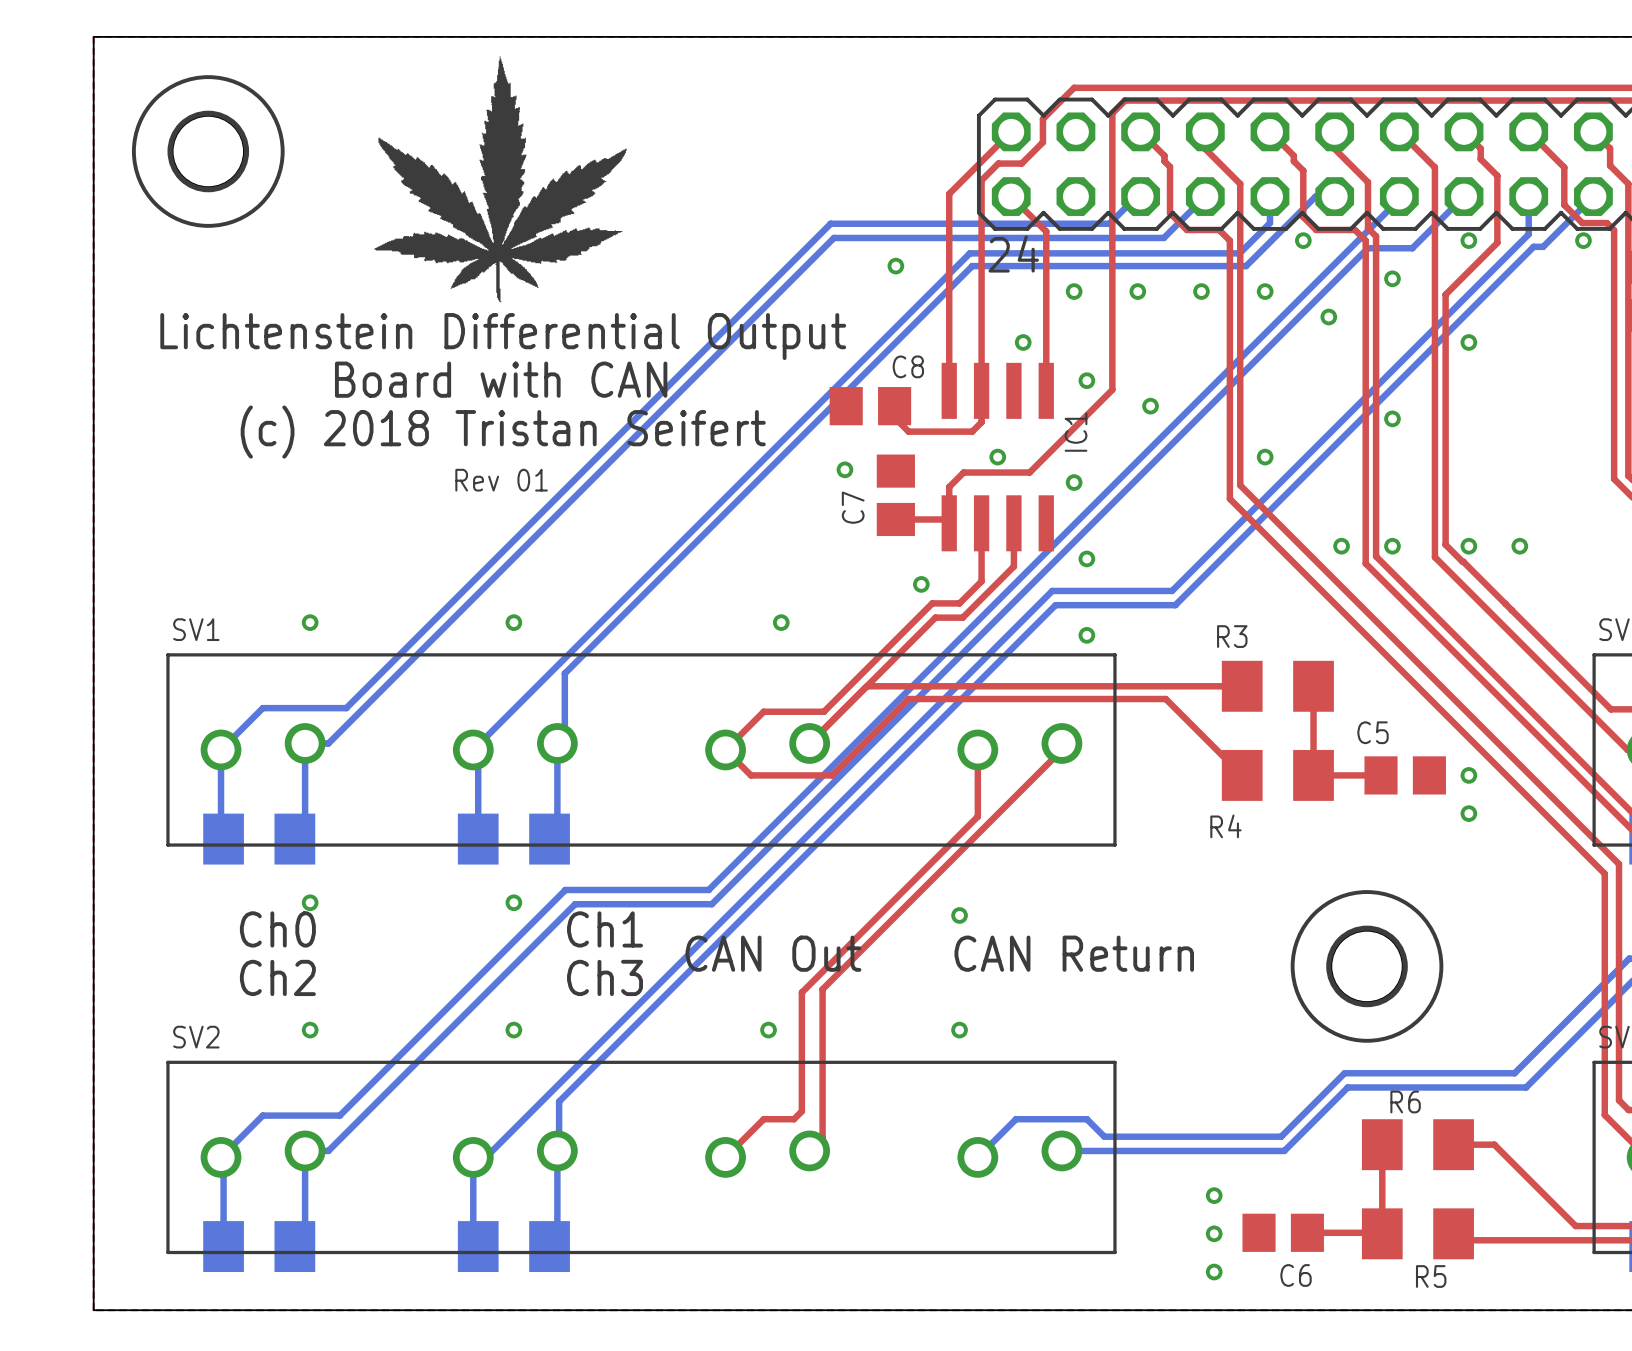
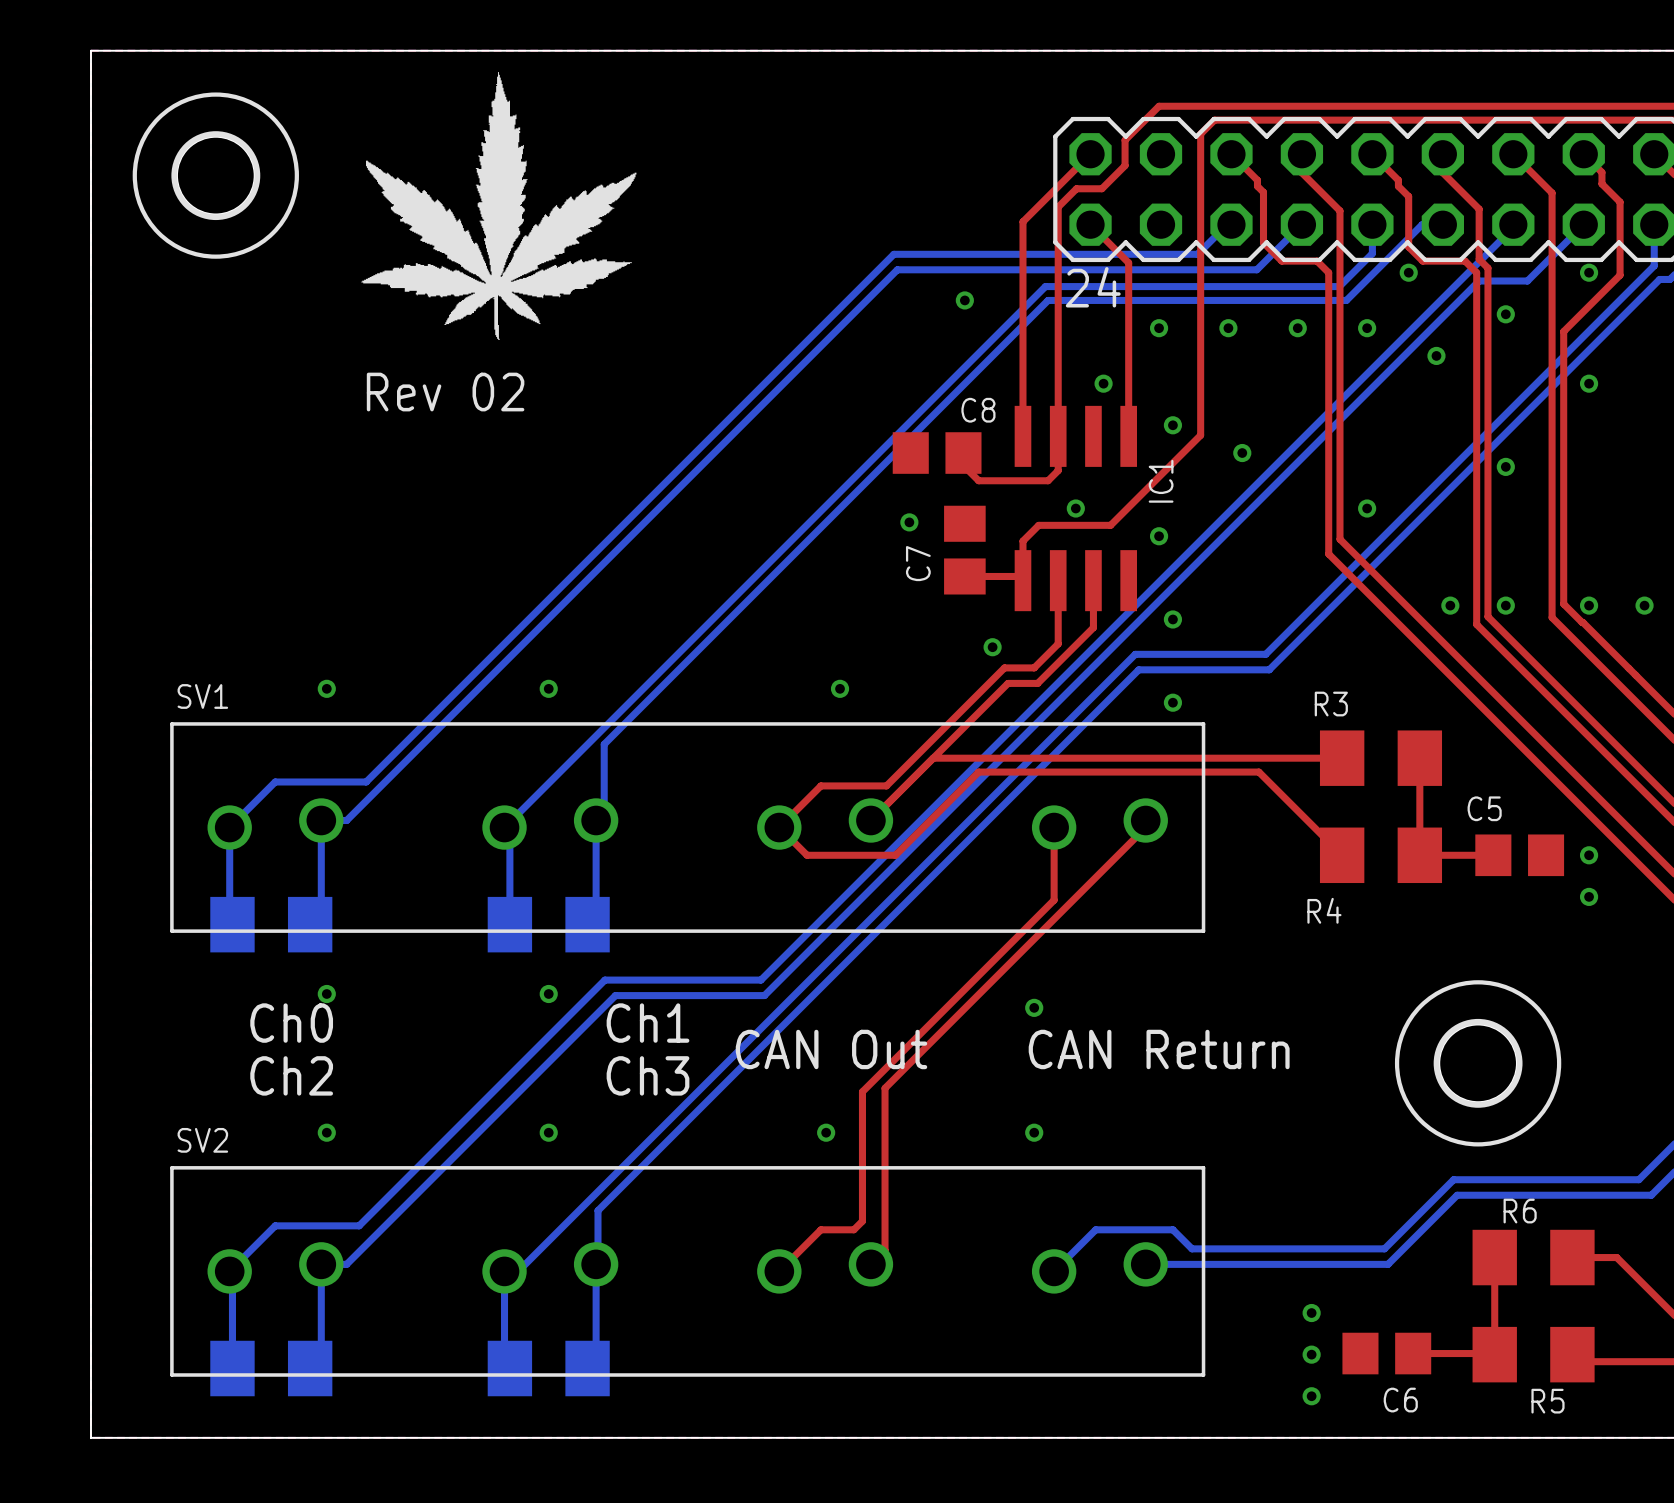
drawing position: (500, 179) -> (498, 205)
text: Lichtenstein Differential Output (503, 336) -> none
text: none -> Rev 02 (445, 392)
text: Board with CAN (501, 379) -> none
text: (c) 2018 Tristan Seifert (503, 432) -> none
text: Rev 01 (501, 480) -> none

